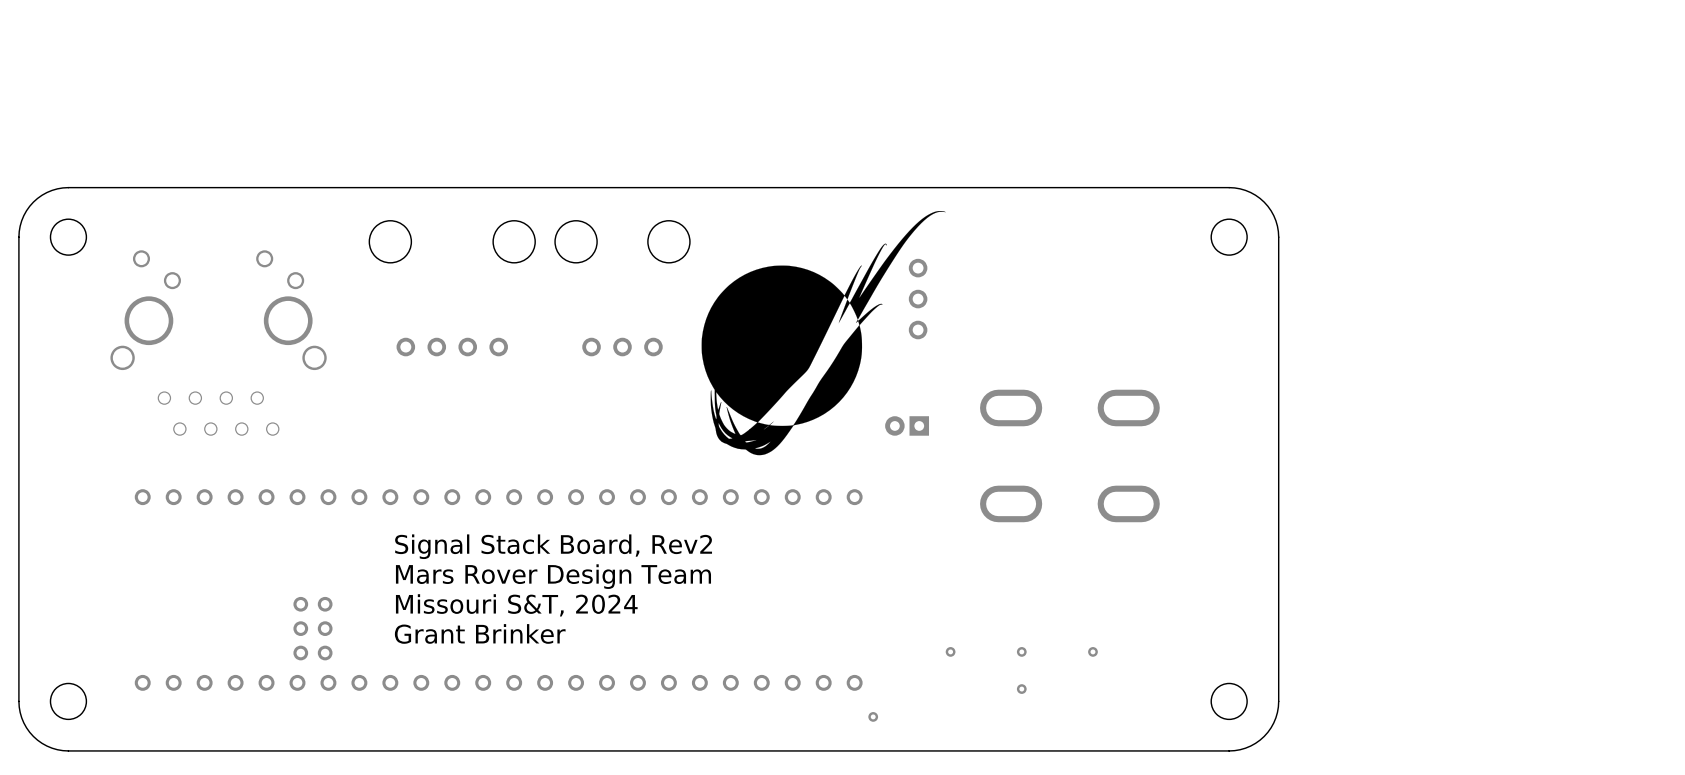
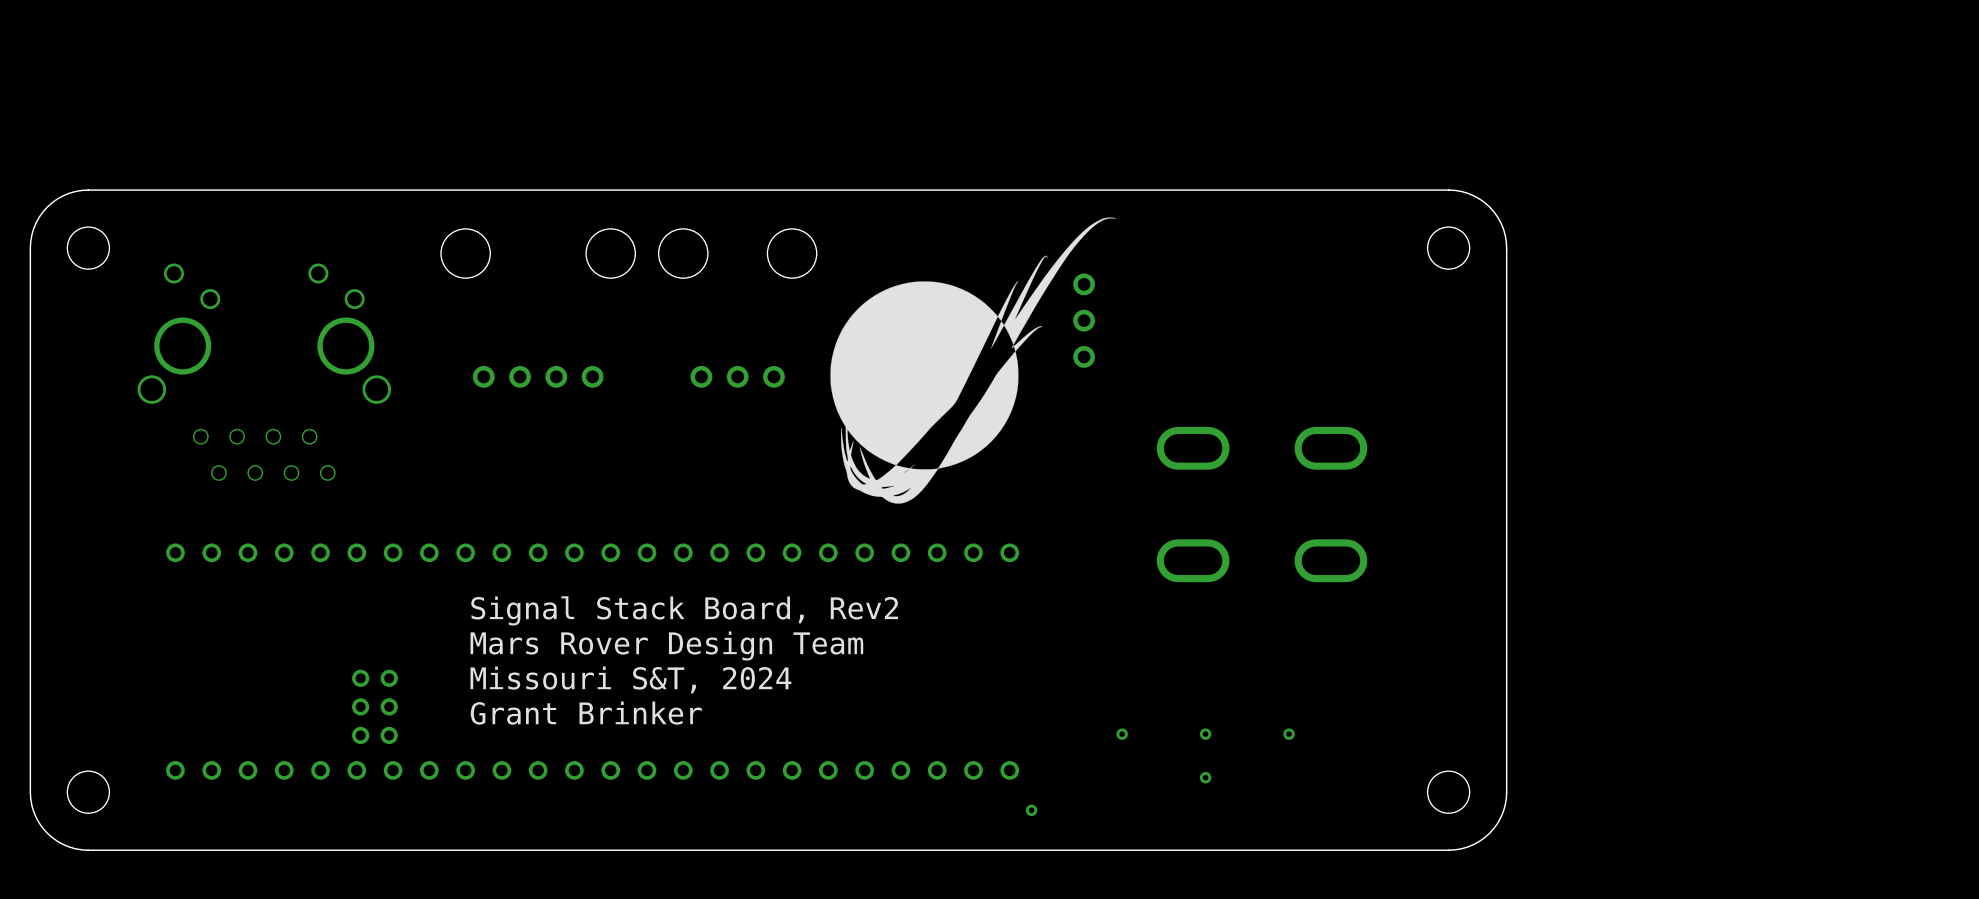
part: (907, 425) -> none

